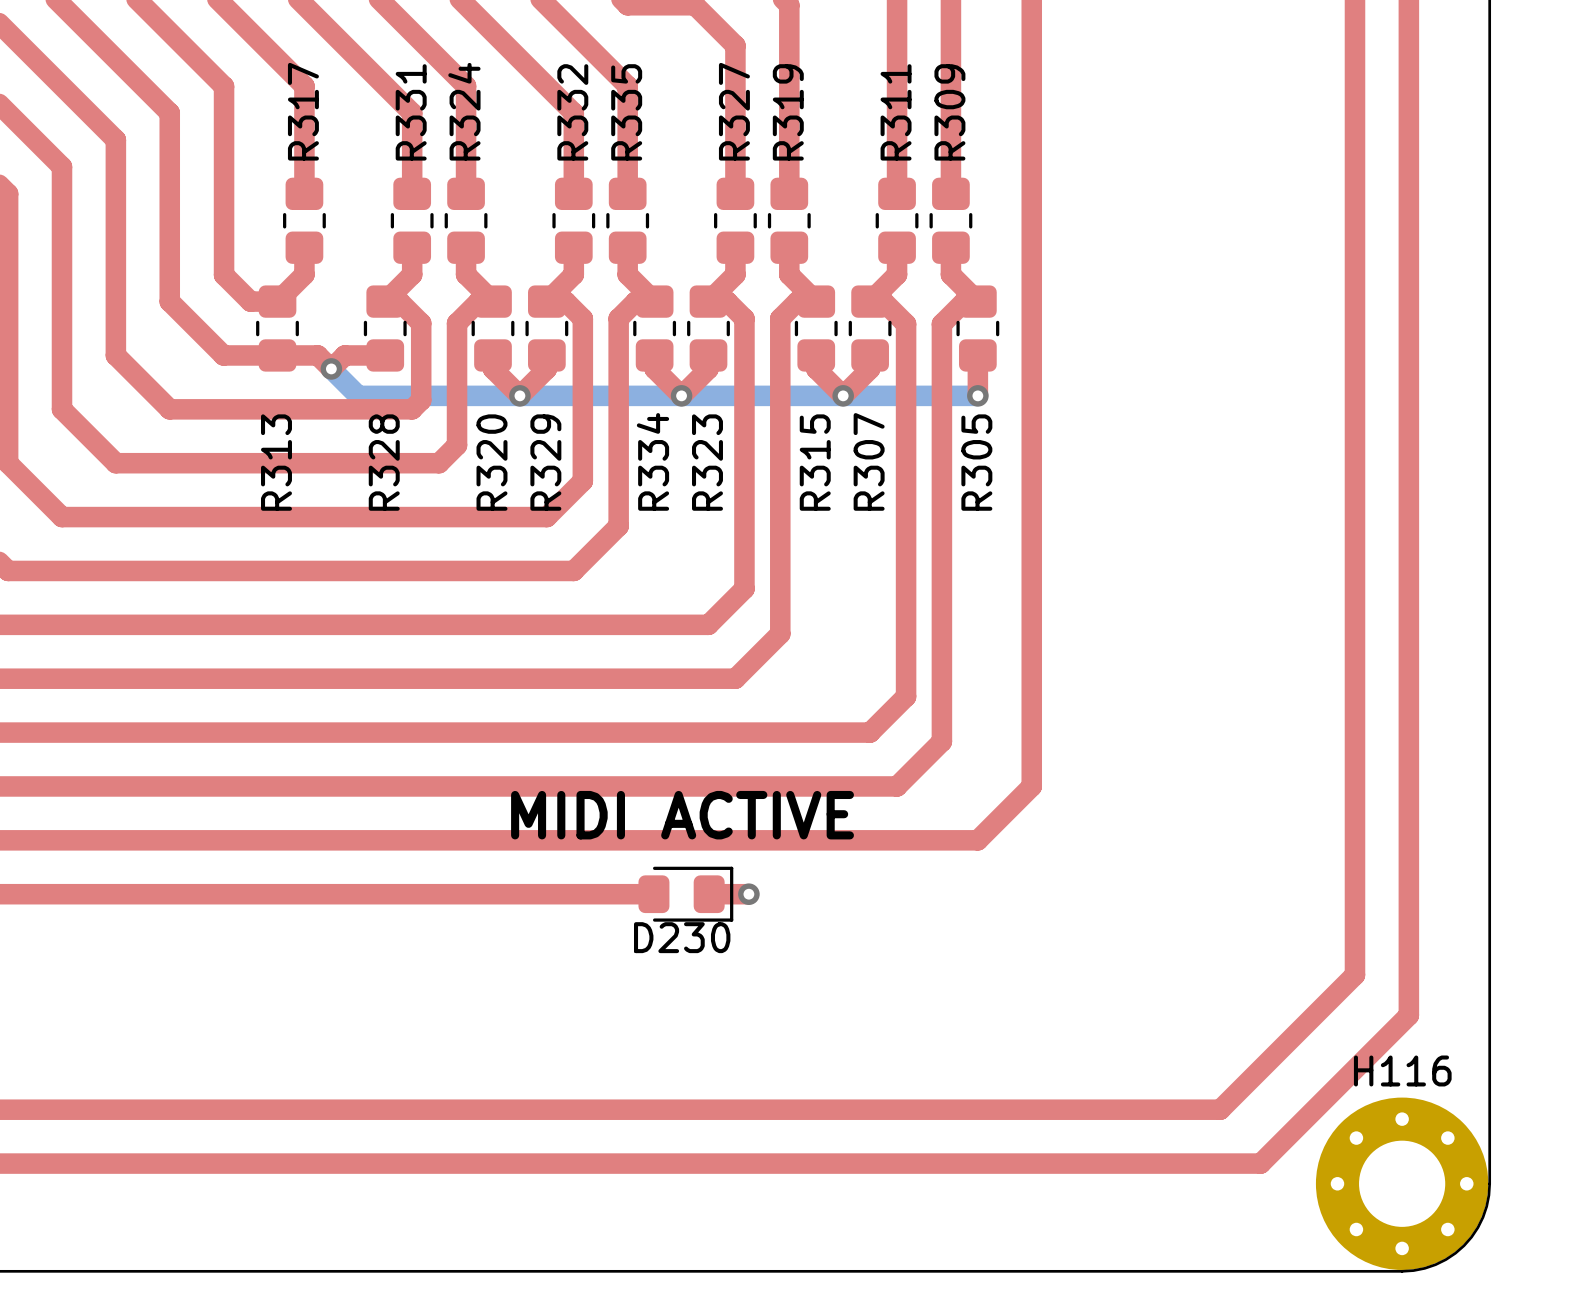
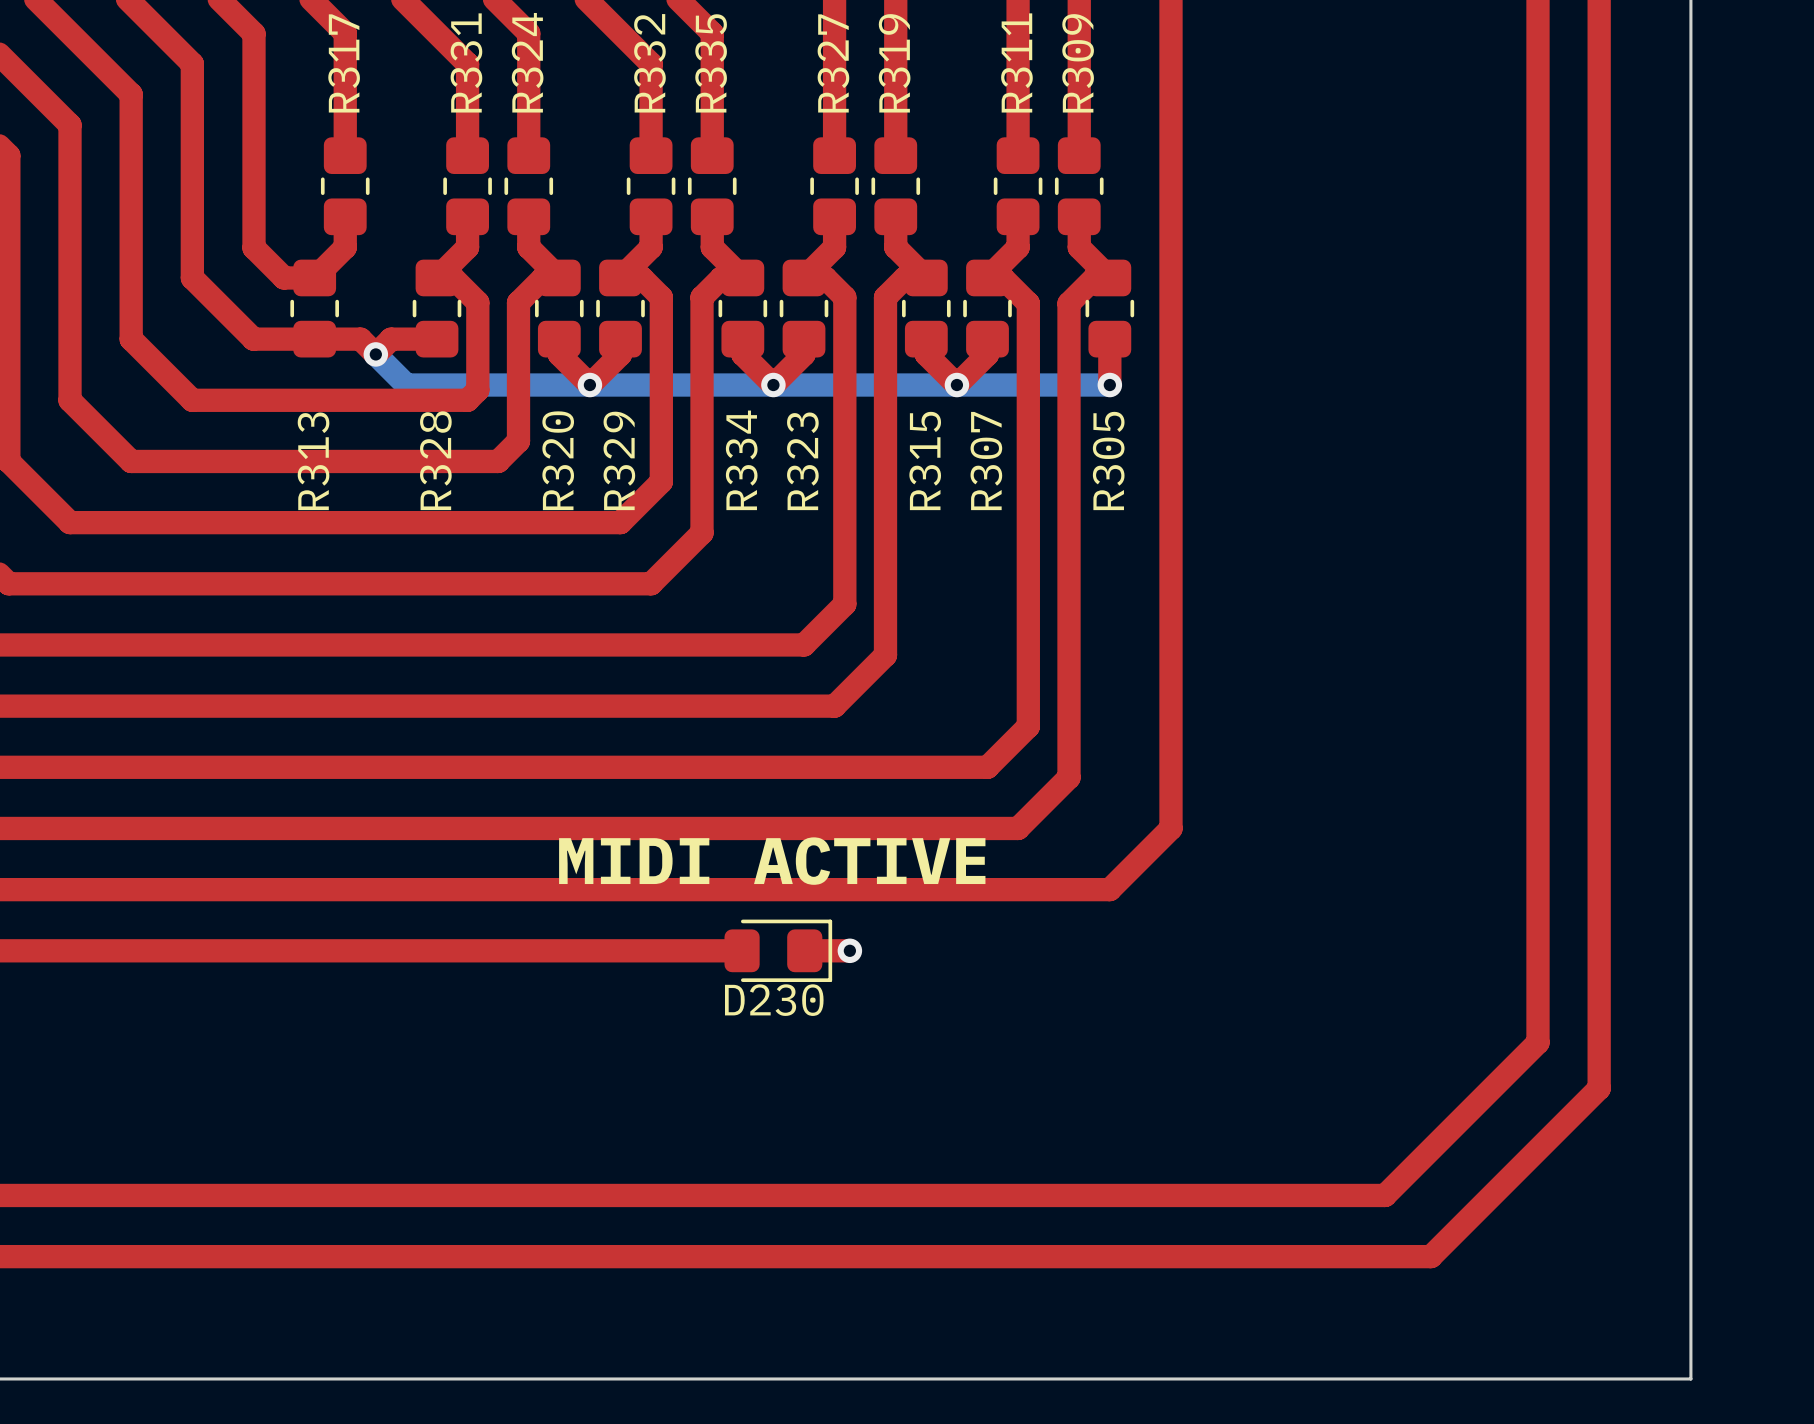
H116: (1402, 1183) -> none
board edge: (1489, 1183) (1483, 1217) (1464, 1245) (1435, 1264) (1402, 1271) -> (1690, 1279) (1690, 1378) (1591, 1378)

